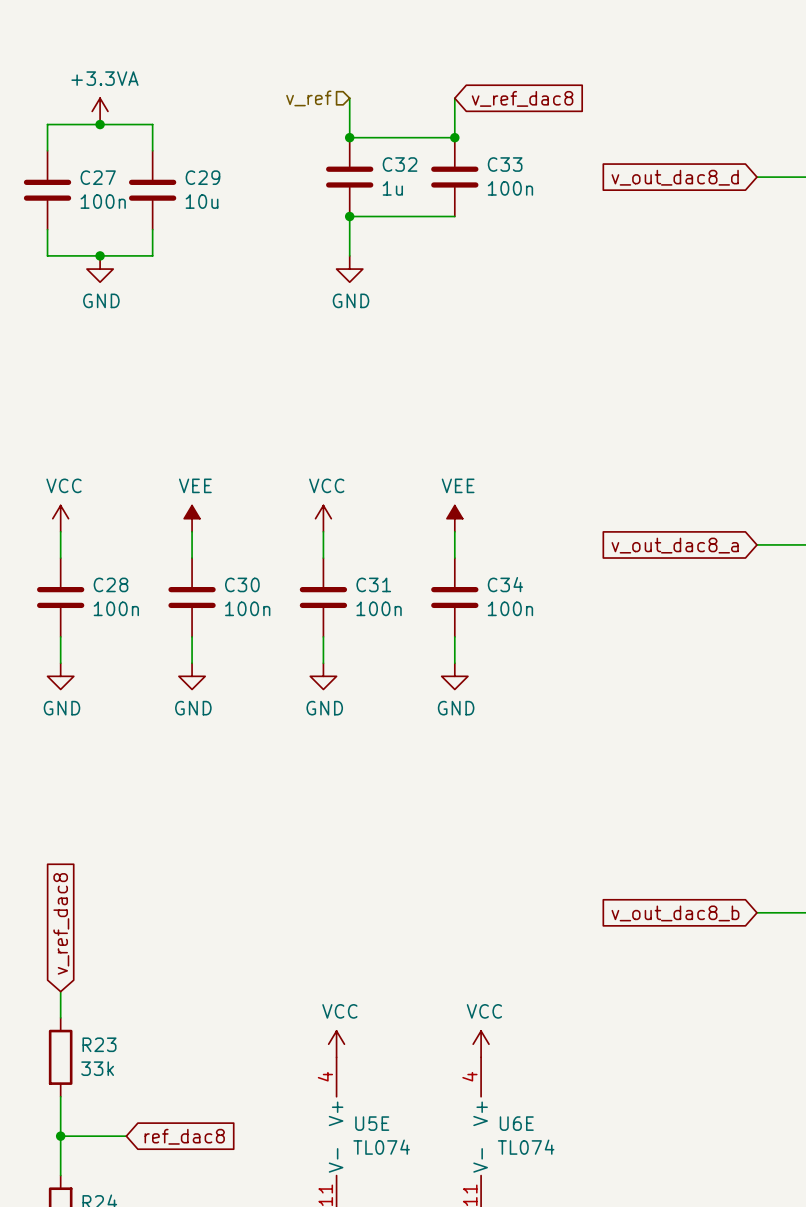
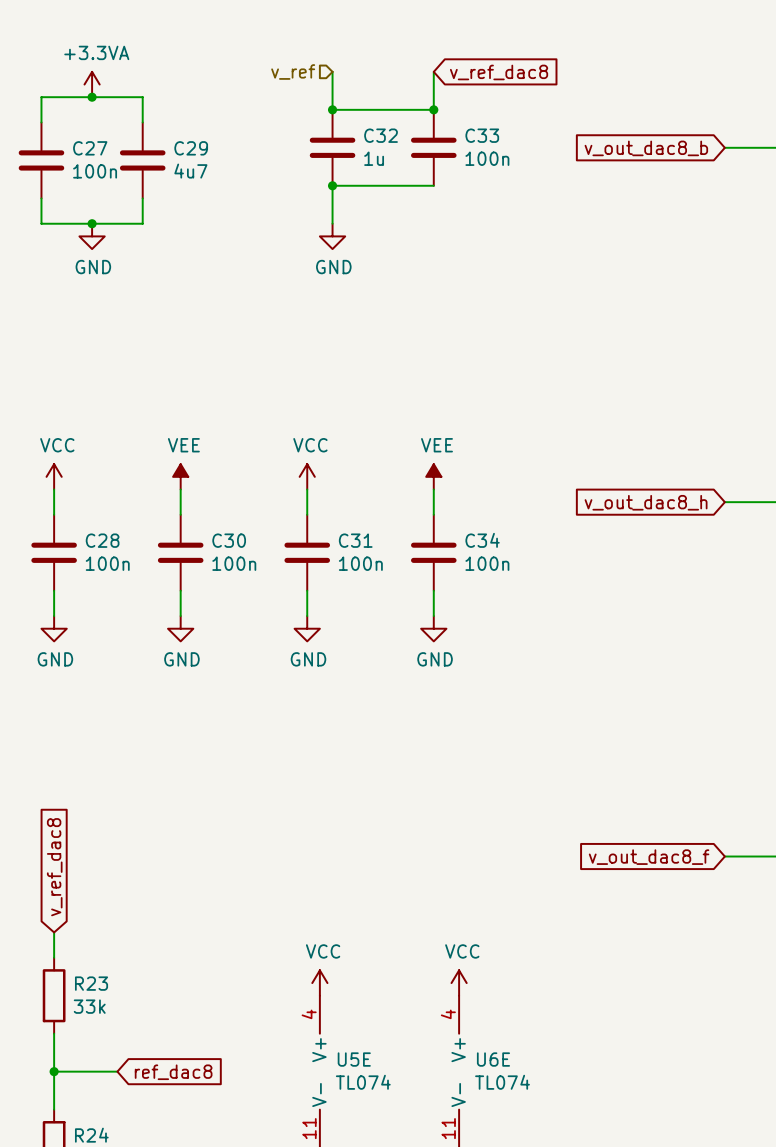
global label: v_out_dac8_d (675, 177) -> v_out_dac8_b (646, 148)
C29 value: 10u (202, 201) -> 4u7 (190, 171)
global label: v_out_dac8_a (675, 545) -> v_out_dac8_h (646, 502)
global label: v_out_dac8_b (675, 913) -> v_out_dac8_f (649, 857)

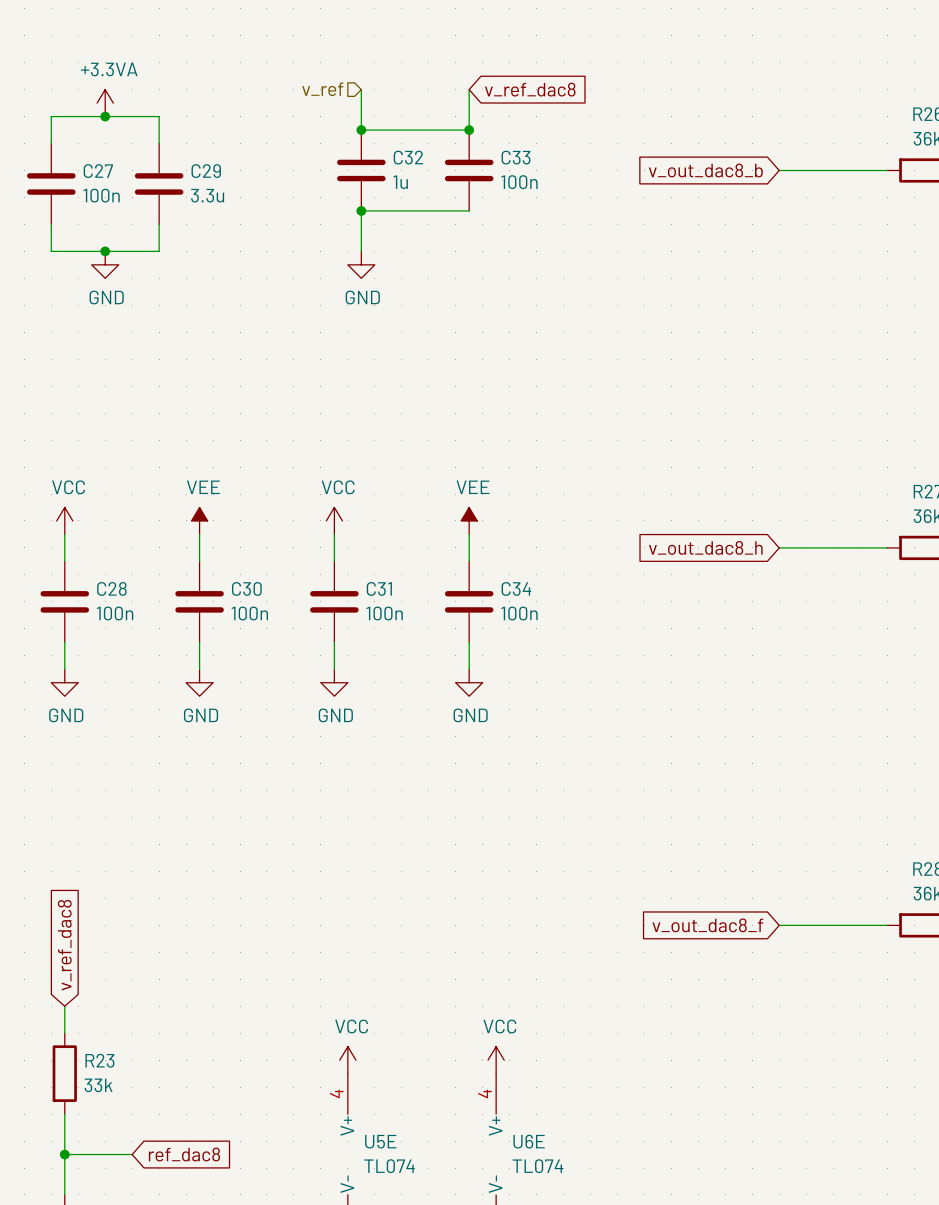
C29 value: 4u7 (190, 171) -> 3.3u (207, 195)

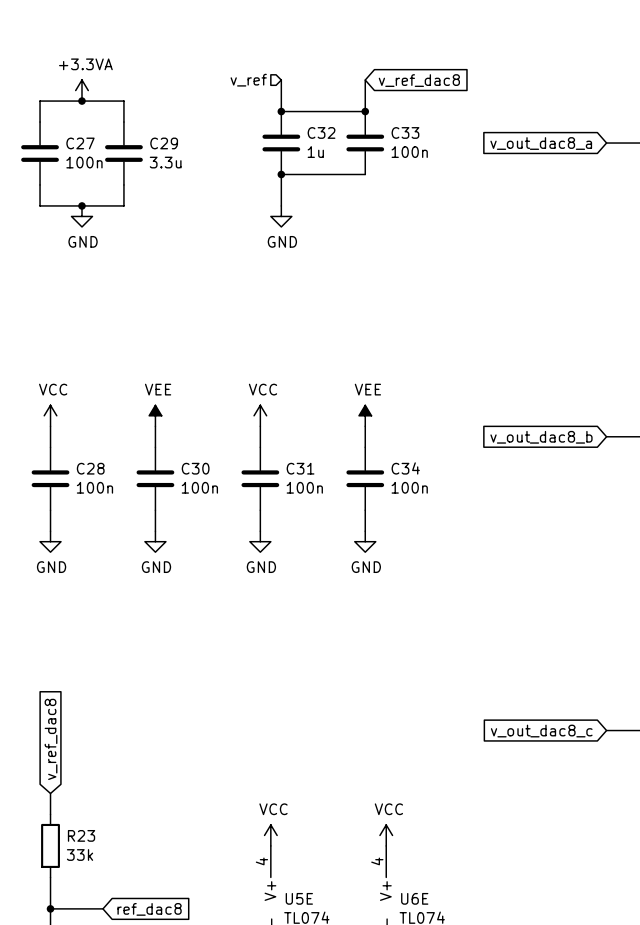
global label: v_out_dac8_b (705, 170) -> v_out_dac8_a (541, 143)
global label: v_out_dac8_h (705, 547) -> v_out_dac8_b (541, 437)
global label: v_out_dac8_f (707, 925) -> v_out_dac8_c (541, 731)

